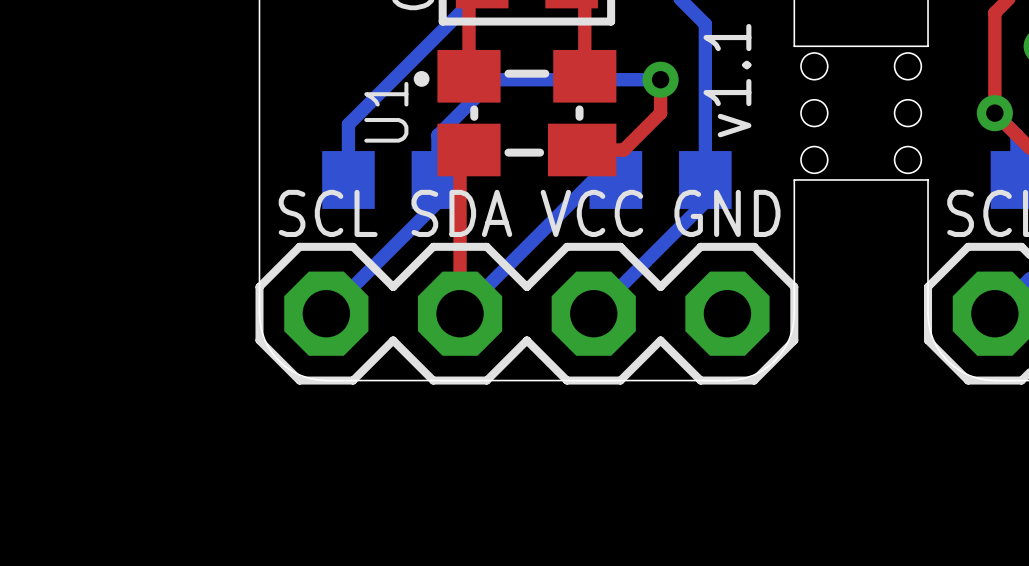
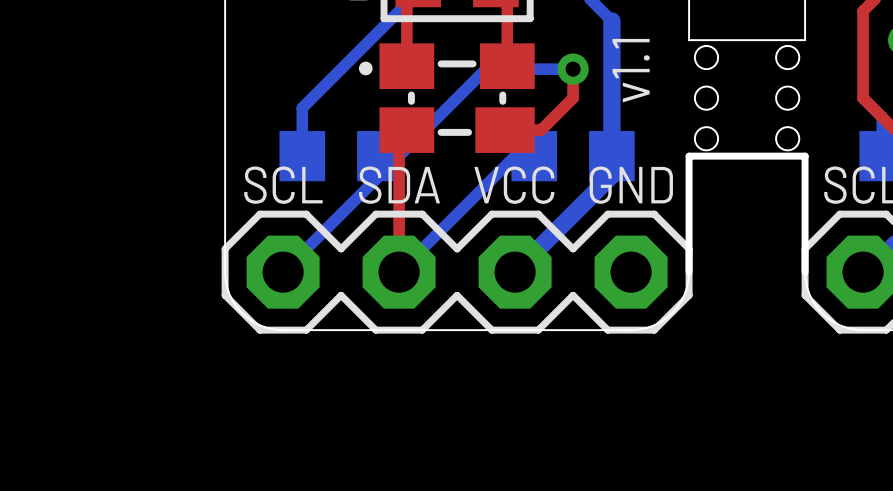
bottom track width: thin (705, 24) (705, 202) (593, 313) -> thick (611, 20) (611, 175) (515, 272)
bottom track: (560, 79) (493, 79) (437, 135) (437, 179) -> (486, 69) (379, 175)
U1 name: U1 (386, 112) -> none
via: (994, 113) -> none
board edge width: thin (794, 313) (794, 179) (928, 179) (928, 313) -> thick (689, 272) (689, 156) (805, 156) (805, 272)

